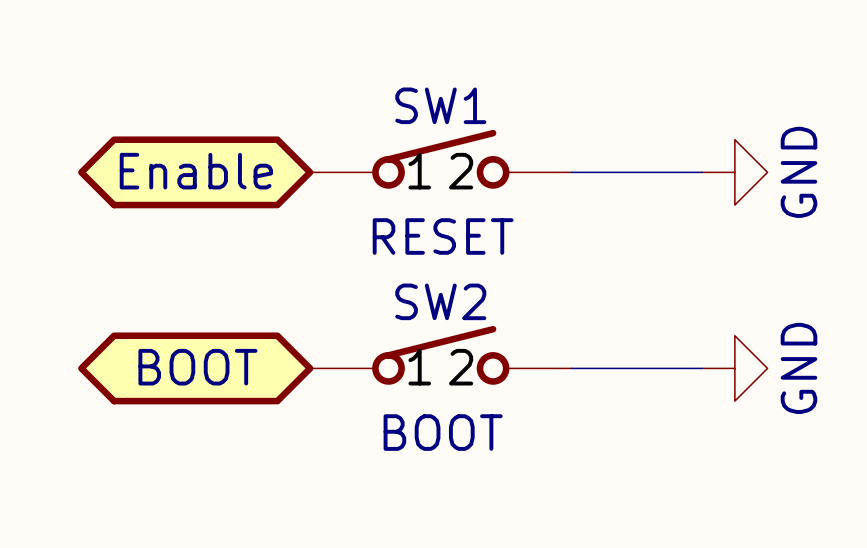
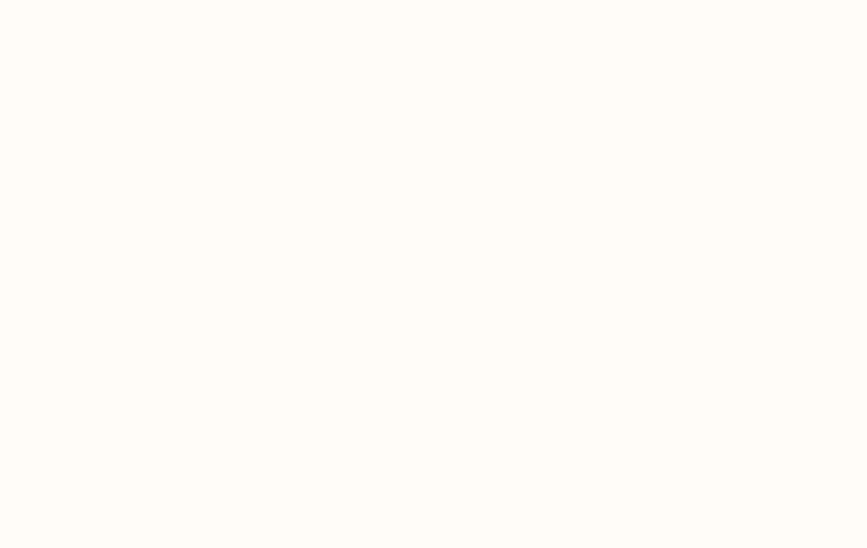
SW1: RESET (440, 159) -> none
power symbol: Enable (195, 172) -> none
wire: (571, 172) (702, 172) -> none
power symbol: GND (734, 172) -> none
SW2: BOOT (440, 355) -> none
power symbol: BOOT (195, 368) -> none
wire: (571, 368) (702, 368) -> none
power symbol: GND (734, 368) -> none

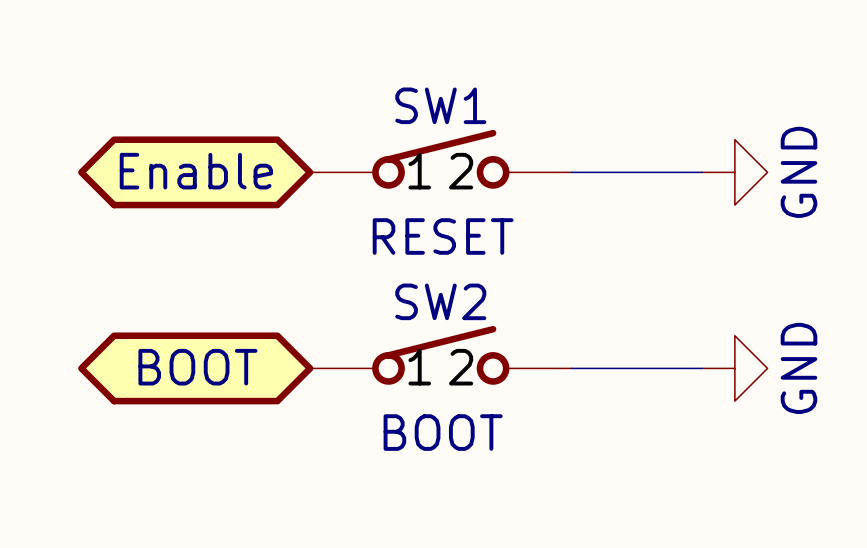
SW1: none -> RESET (440, 159)
power symbol: none -> Enable (195, 172)
wire: none -> (571, 172) (702, 172)
power symbol: none -> GND (734, 172)
SW2: none -> BOOT (440, 355)
power symbol: none -> BOOT (195, 368)
wire: none -> (571, 368) (702, 368)
power symbol: none -> GND (734, 368)

